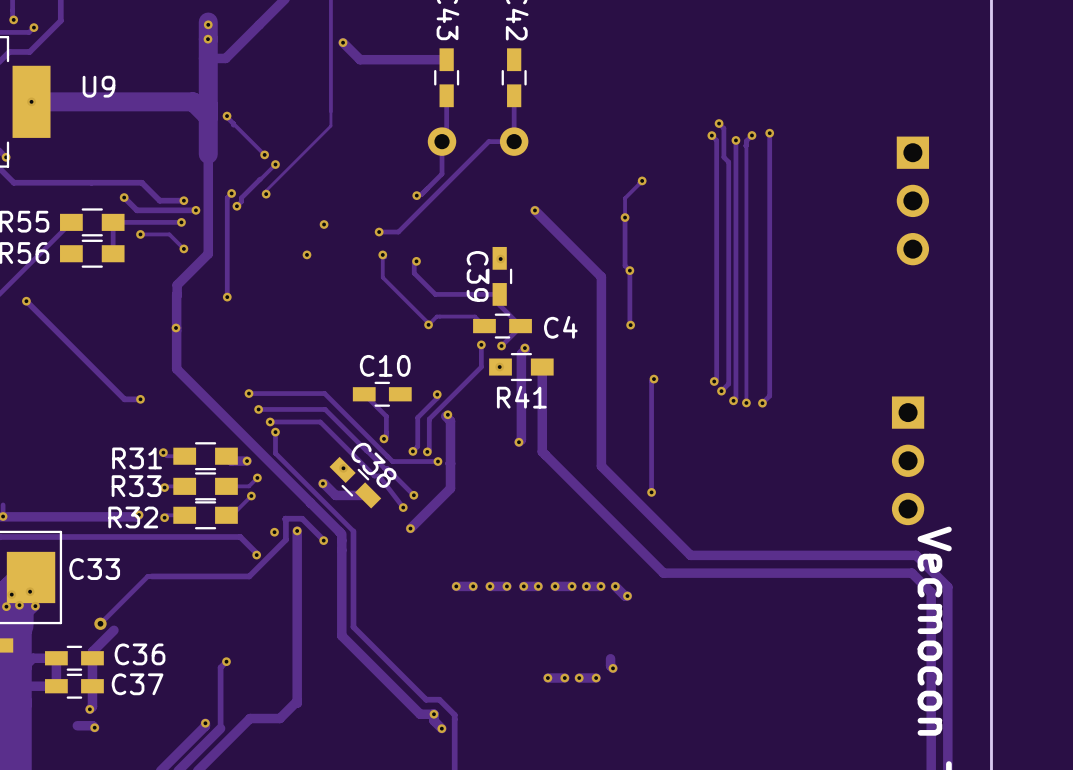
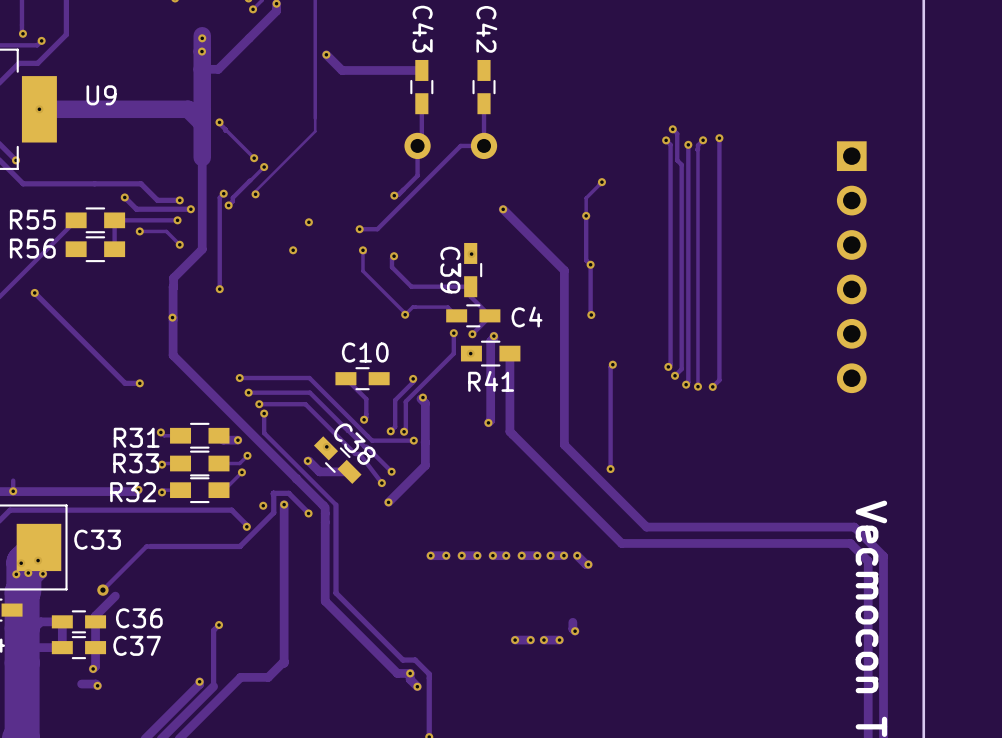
part: (912, 200) -> none
part: none -> (851, 267)
part: (908, 460) -> none

